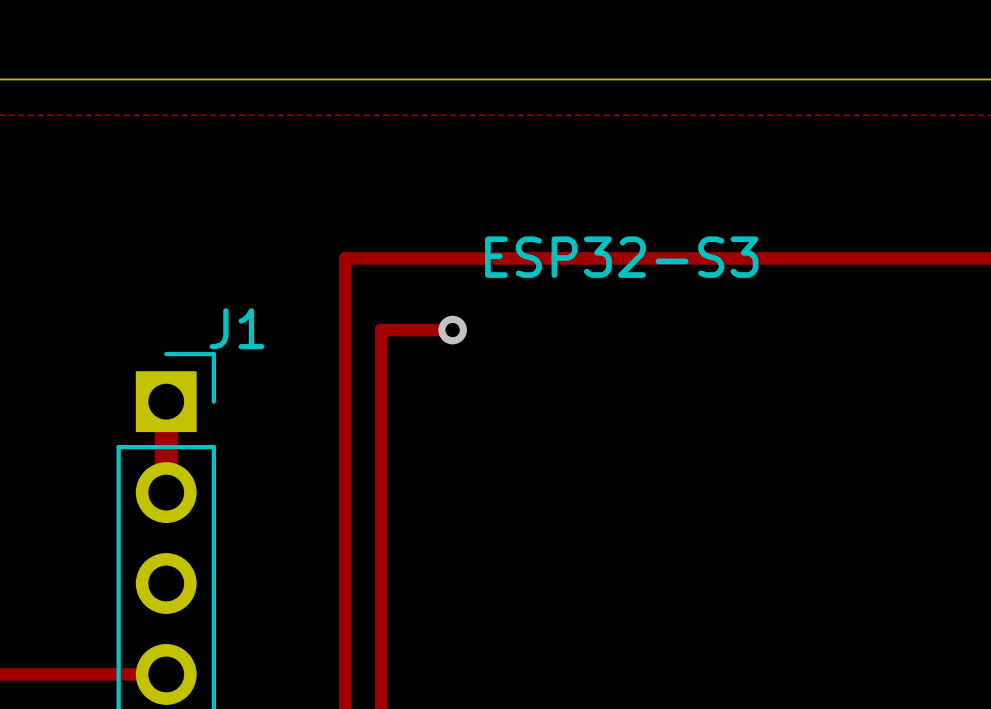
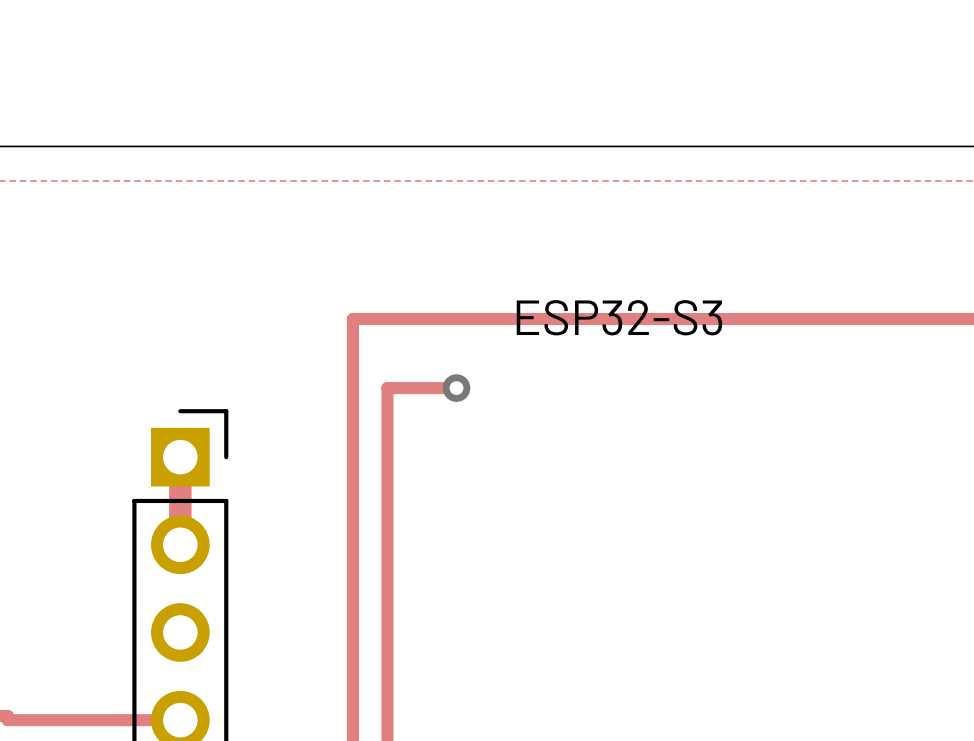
J1 name: J1 (236, 328) -> none

